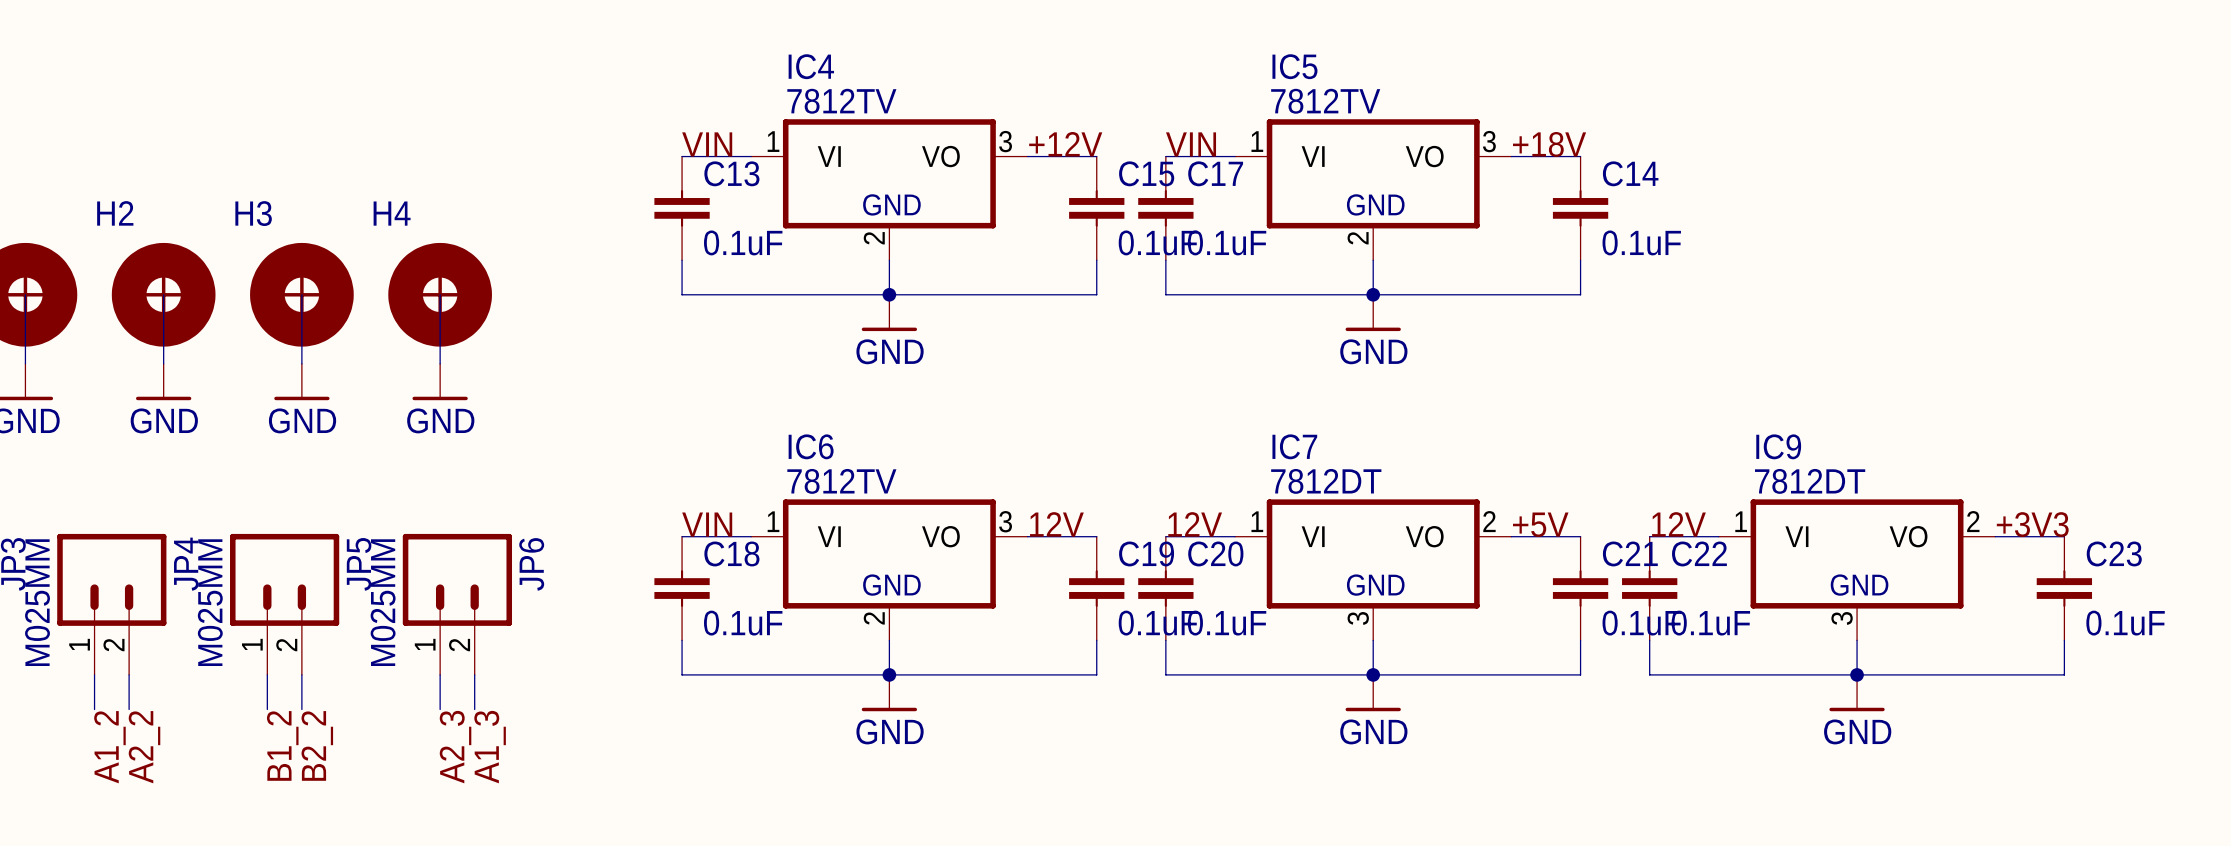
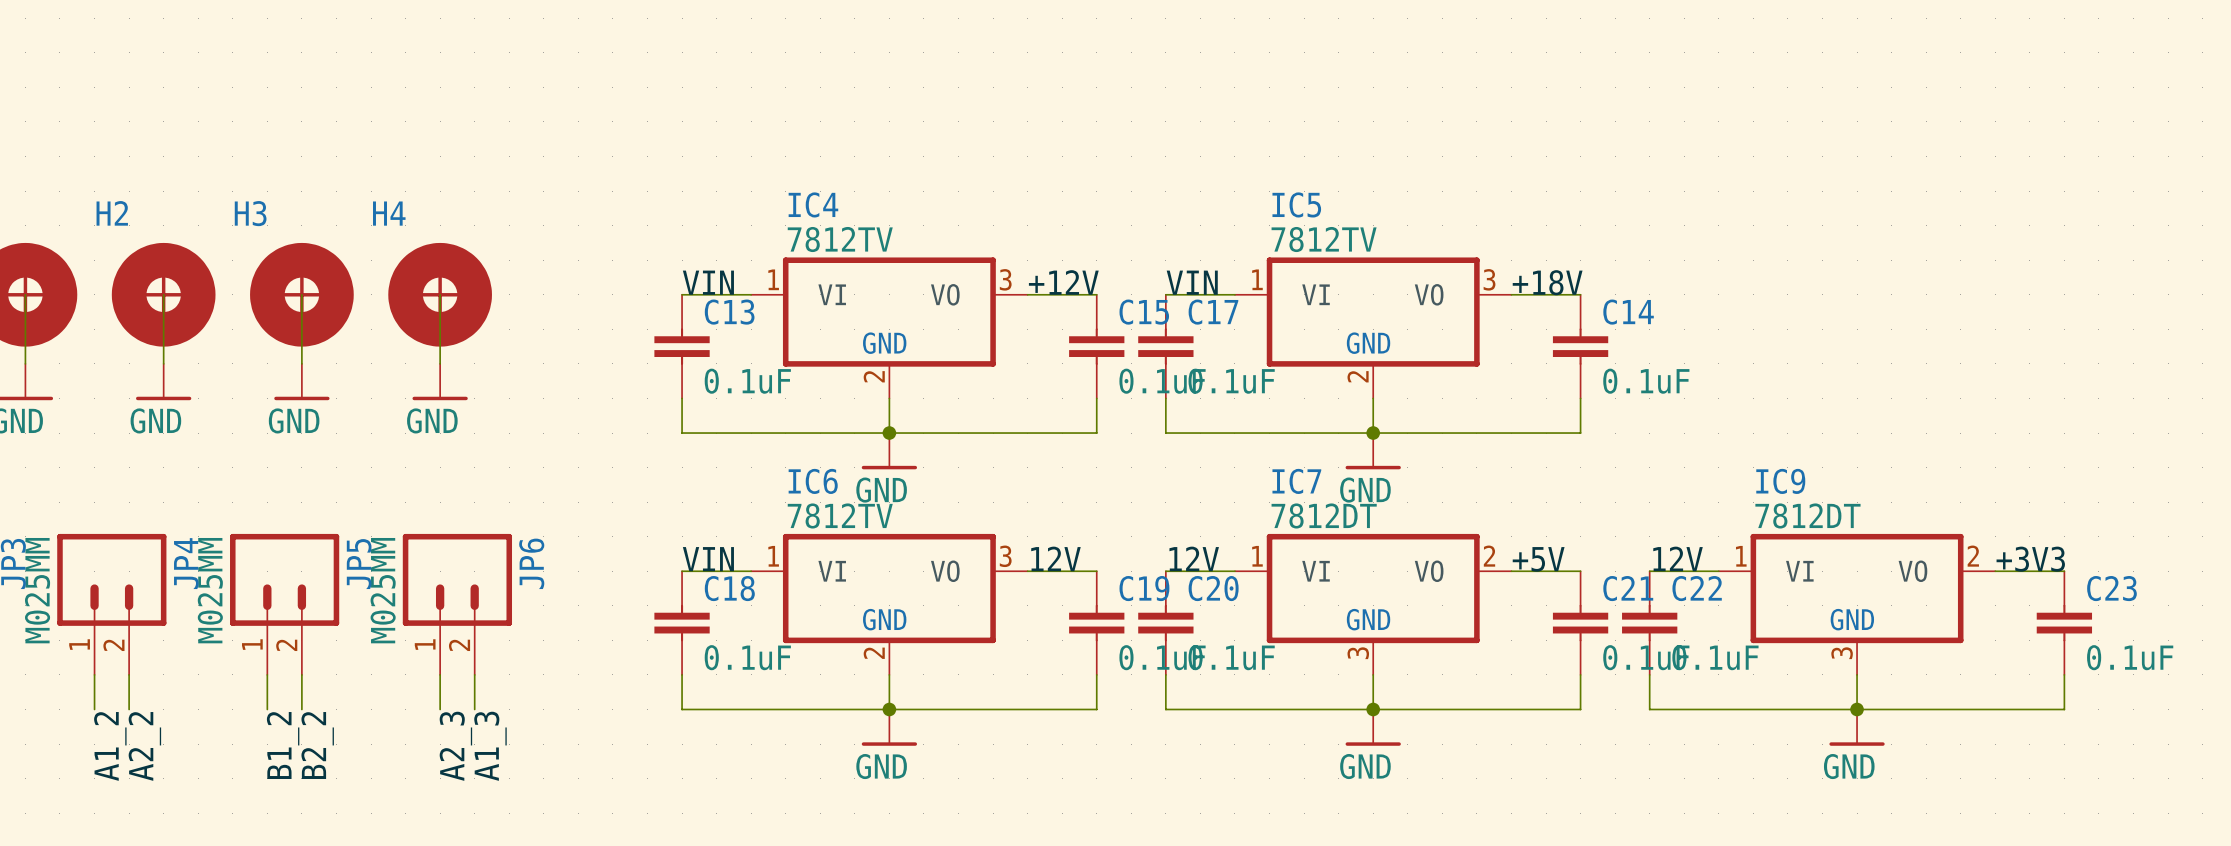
label: VIN (707, 144) -> none
label position: +12V (1065, 144) -> +12V (1063, 282)
label position: VIN (1191, 144) -> VIN (1192, 282)
label position: +18V (1549, 144) -> +18V (1547, 282)
wire: (682, 156) (751, 156) -> none
wire: (1027, 156) (1096, 156) -> none
wire: (1165, 156) (1234, 156) -> none
wire: (1511, 156) (1580, 156) -> none
IC4 position: (889, 189) -> (889, 327)
IC5 position: (1373, 189) -> (1373, 327)
C13 position: (682, 208) -> (682, 346)
C15 position: (1096, 208) -> (1096, 346)
C17 position: (1165, 208) -> (1165, 346)
C14 position: (1580, 208) -> (1580, 346)
wire: (682, 260) (682, 294) -> none
wire: (889, 260) (889, 294) -> (889, 398) (889, 433)
wire: (1096, 260) (1096, 294) -> none
wire: (1165, 260) (1165, 294) -> none
wire: (1373, 260) (1373, 294) -> (1373, 398) (1373, 433)
wire: (1580, 260) (1580, 294) -> none
label: none -> VIN (708, 282)
wire: (751, 294) (1027, 294) -> none
junction: (889, 294) -> none
wire: (1234, 294) (1511, 294) -> none
junction: (1373, 294) -> none
power symbol: GND (889, 312) -> none
power symbol: GND (1373, 312) -> none
wire: none -> (682, 398) (682, 433) (1096, 433) (1096, 398)
wire: none -> (1165, 398) (1165, 433) (1580, 433) (1580, 398)
junction: none -> (889, 433)
junction: none -> (1373, 433)
power symbol: none -> GND (889, 451)
power symbol: none -> GND (1373, 451)
label position: VIN (707, 524) -> VIN (708, 559)
label position: 12V (1056, 524) -> 12V (1055, 558)
label position: 12V (1195, 524) -> 12V (1194, 558)
label position: +5V (1540, 524) -> +5V (1538, 559)
label position: 12V (1678, 524) -> 12V (1678, 558)
label position: +3V3 (2032, 524) -> +3V3 (2030, 559)
wire: (682, 536) (751, 536) -> (682, 571) (751, 571)
wire: (1027, 536) (1096, 536) -> (1027, 571) (1096, 571)
wire: (1165, 536) (1234, 536) -> (1165, 571) (1234, 571)
wire: (1511, 536) (1580, 536) -> (1511, 571) (1580, 571)
wire: (1649, 536) (1718, 536) -> (1649, 571) (1718, 571)
wire: (1995, 536) (2064, 536) -> (1995, 571) (2064, 571)
IC6 position: (889, 569) -> (889, 604)
IC7 position: (1373, 569) -> (1373, 604)
IC9 position: (1857, 569) -> (1857, 604)
C18 position: (682, 588) -> (682, 623)
C19 position: (1096, 588) -> (1096, 623)
C20 position: (1165, 588) -> (1165, 623)
C21 position: (1580, 588) -> (1580, 623)
C22 position: (1649, 588) -> (1649, 623)
C23 position: (2064, 588) -> (2064, 623)
wire: (682, 640) (682, 674) (1096, 674) (1096, 640) -> (682, 674) (682, 709) (1096, 709) (1096, 674)
wire: (1165, 640) (1165, 674) (1580, 674) (1580, 640) -> (1165, 674) (1165, 709) (1580, 709) (1580, 674)
wire: (1649, 640) (1649, 674) (2064, 674) (2064, 640) -> (1649, 674) (1649, 709) (2064, 709) (2064, 674)
junction position: (889, 674) -> (889, 709)
junction position: (1373, 674) -> (1373, 709)
junction position: (1857, 674) -> (1857, 709)
power symbol position: GND (889, 693) -> GND (889, 727)
power symbol position: GND (1373, 693) -> GND (1373, 727)
power symbol position: GND (1857, 693) -> GND (1857, 727)

